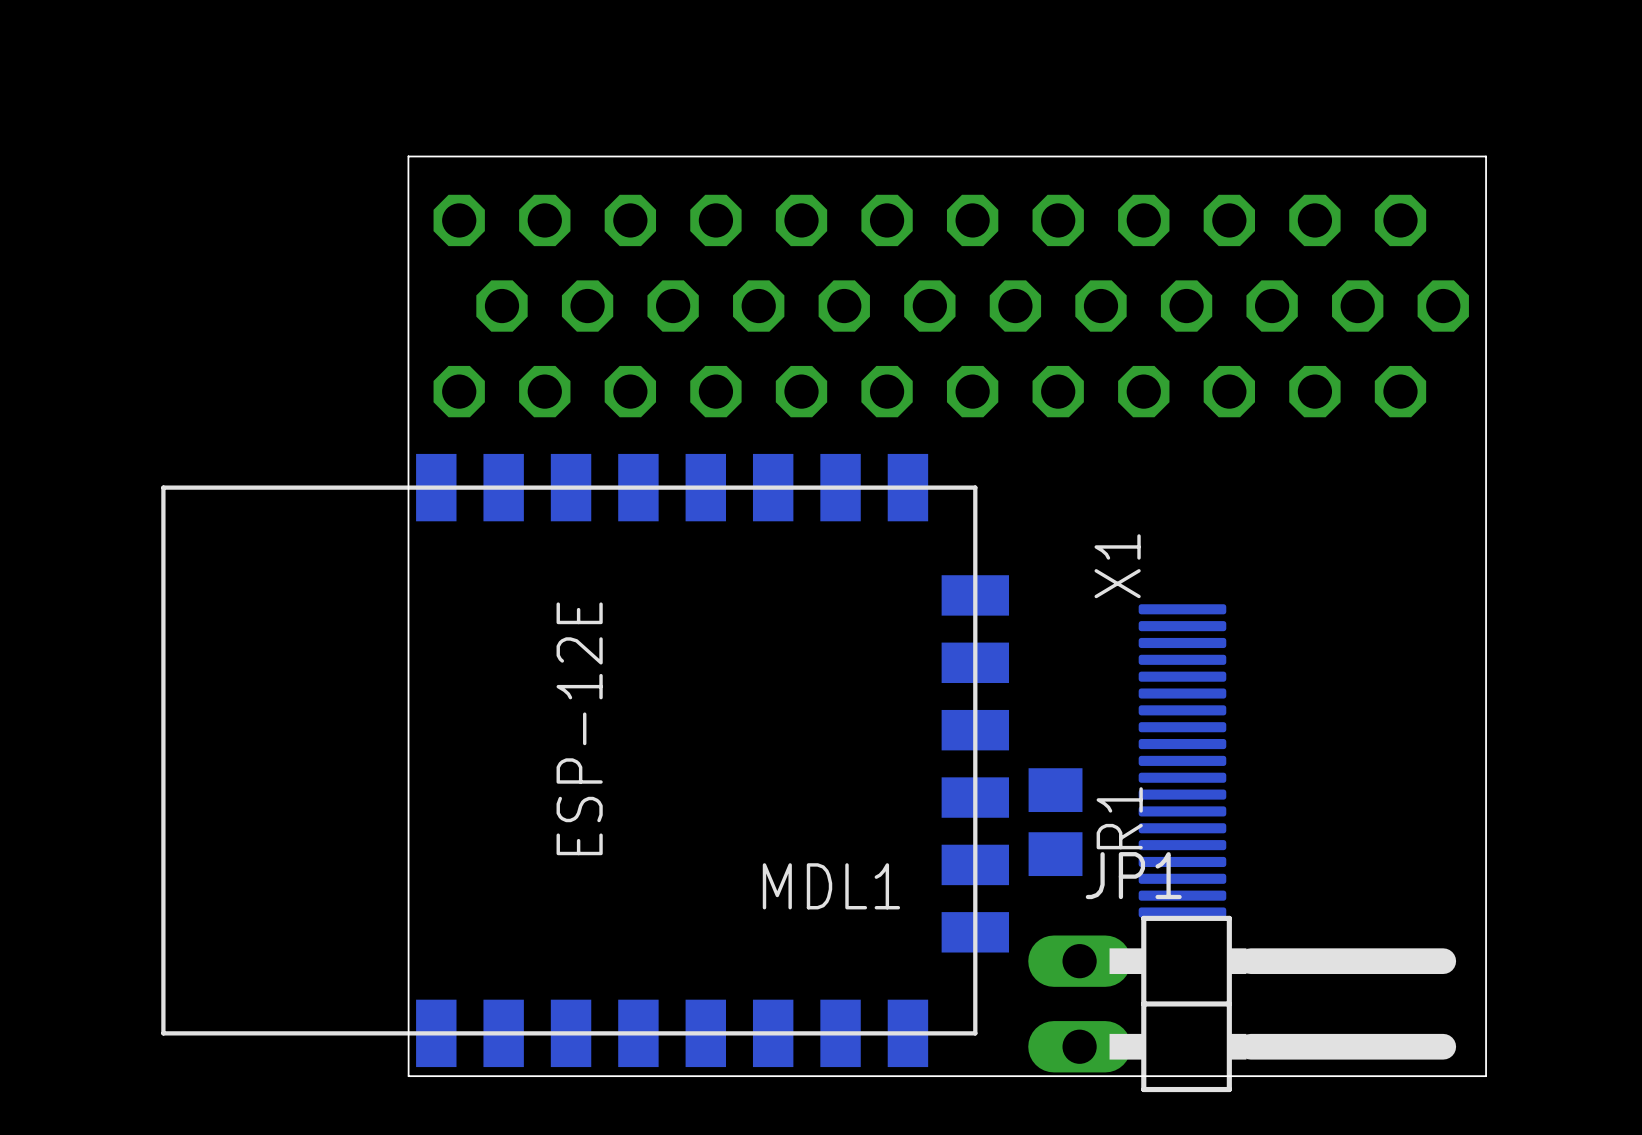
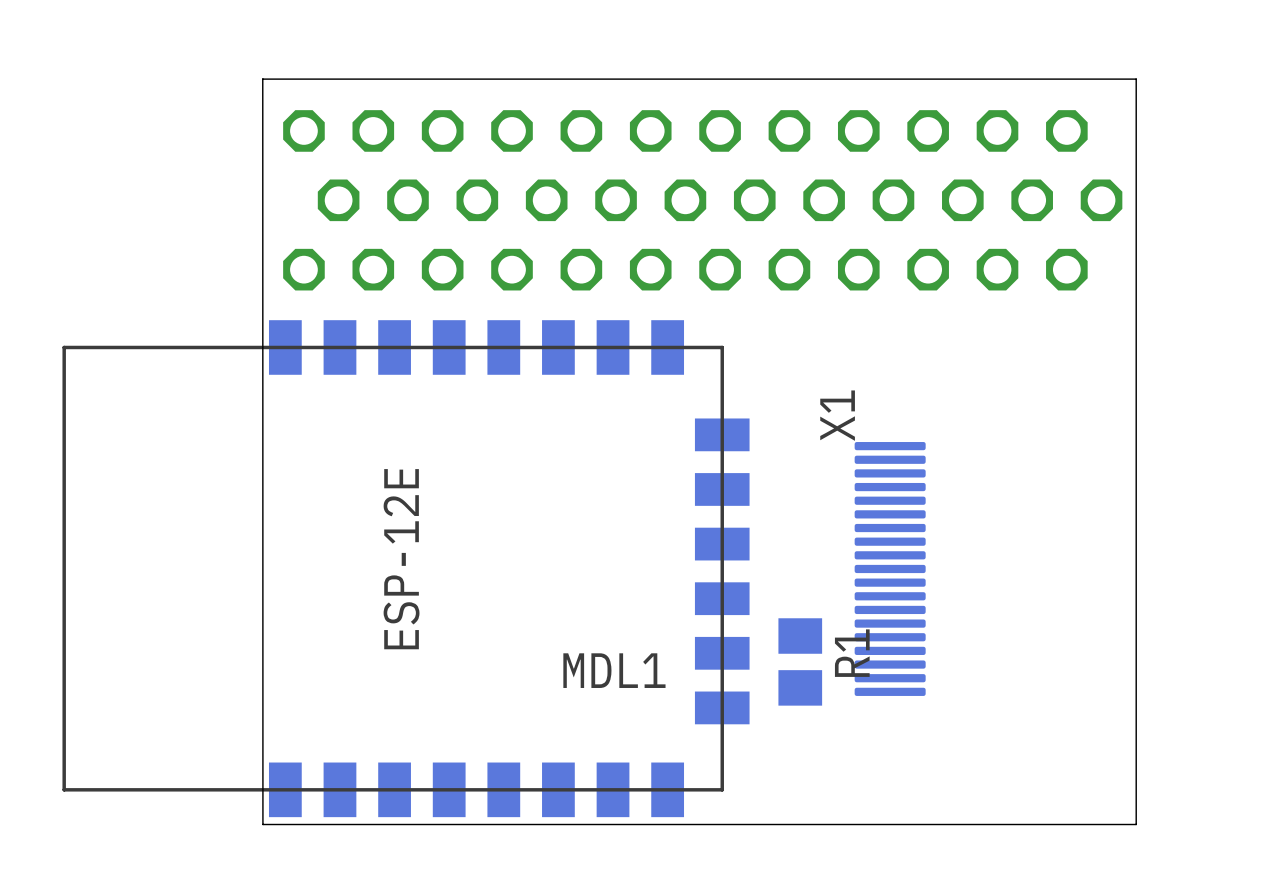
R1 position: (1055, 822) -> (800, 661)
JP1: (1242, 1003) -> none

